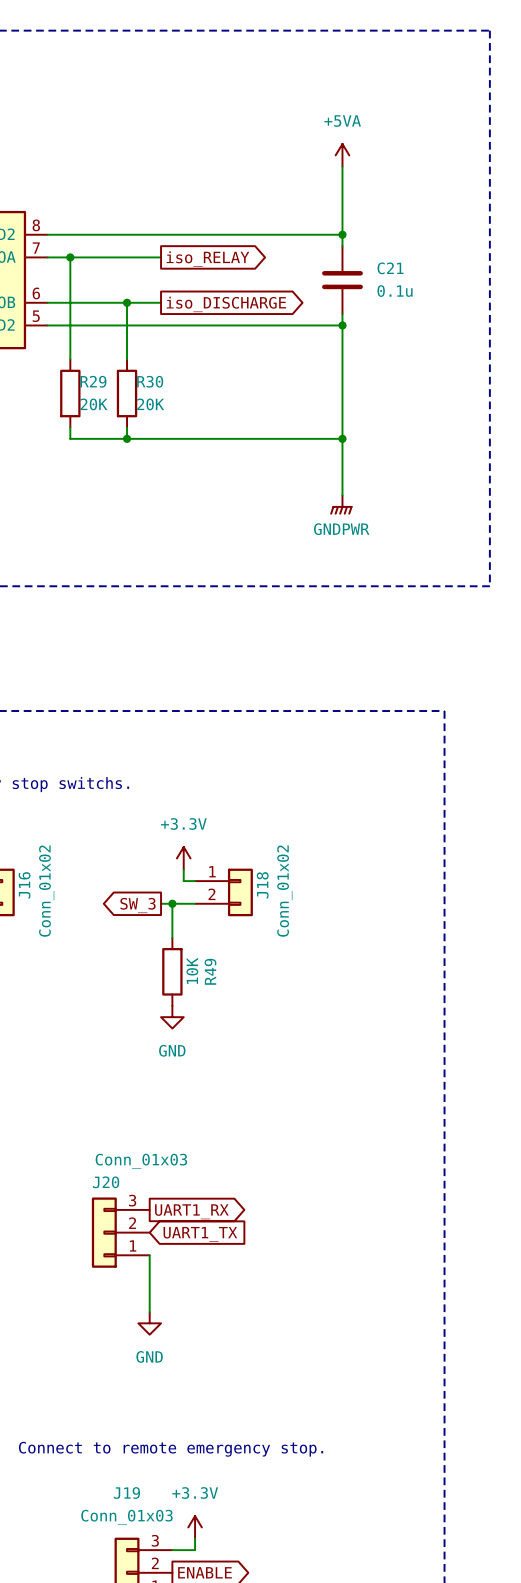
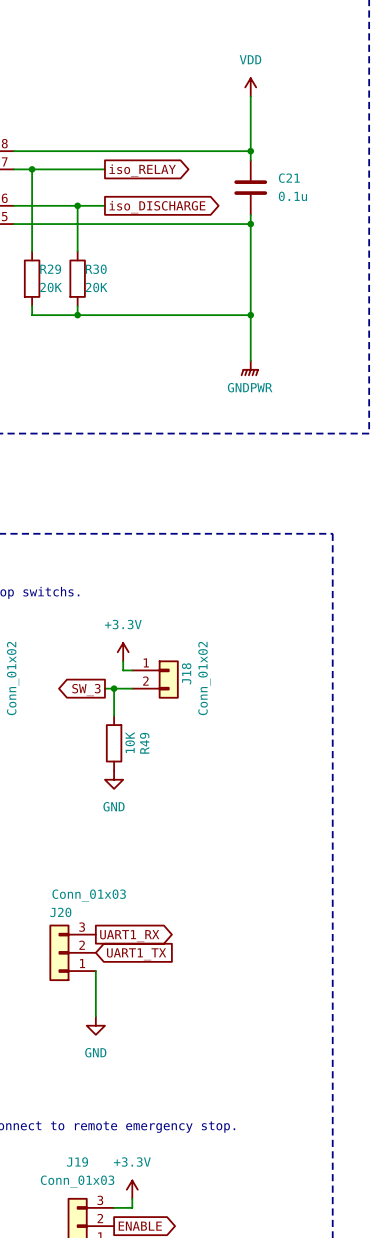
power symbol: +5VA (342, 155) -> VDD (250, 87)

